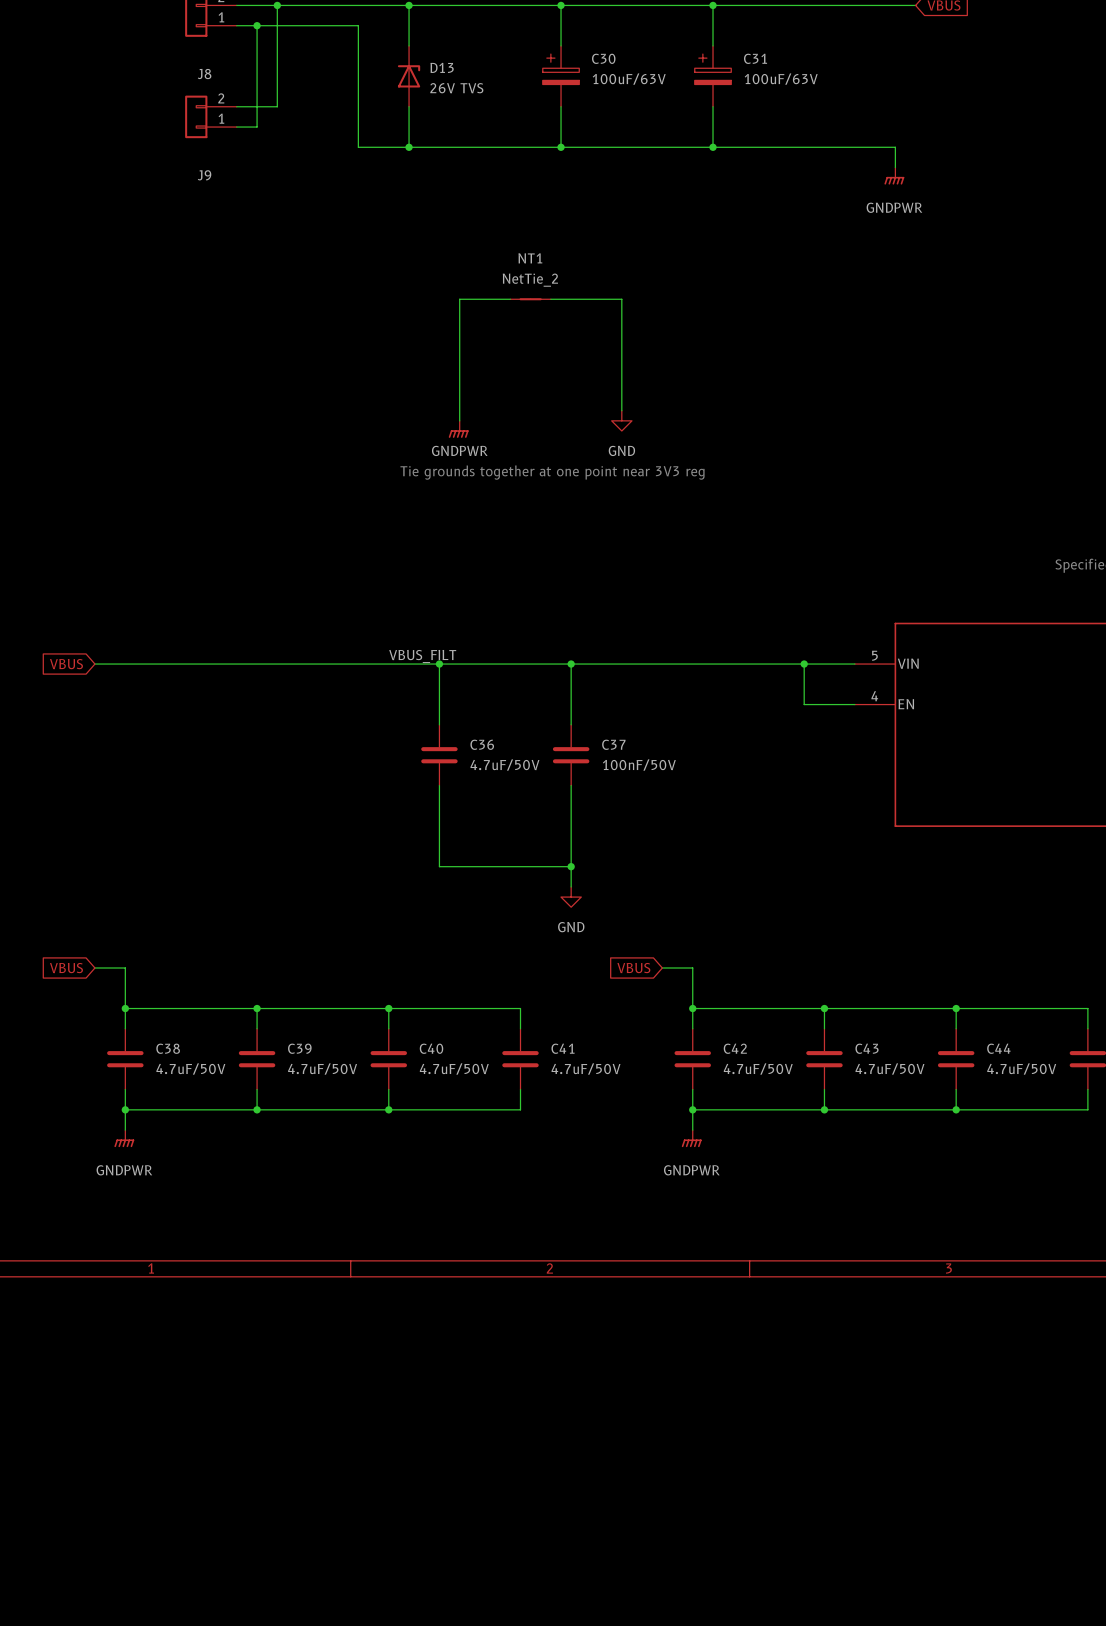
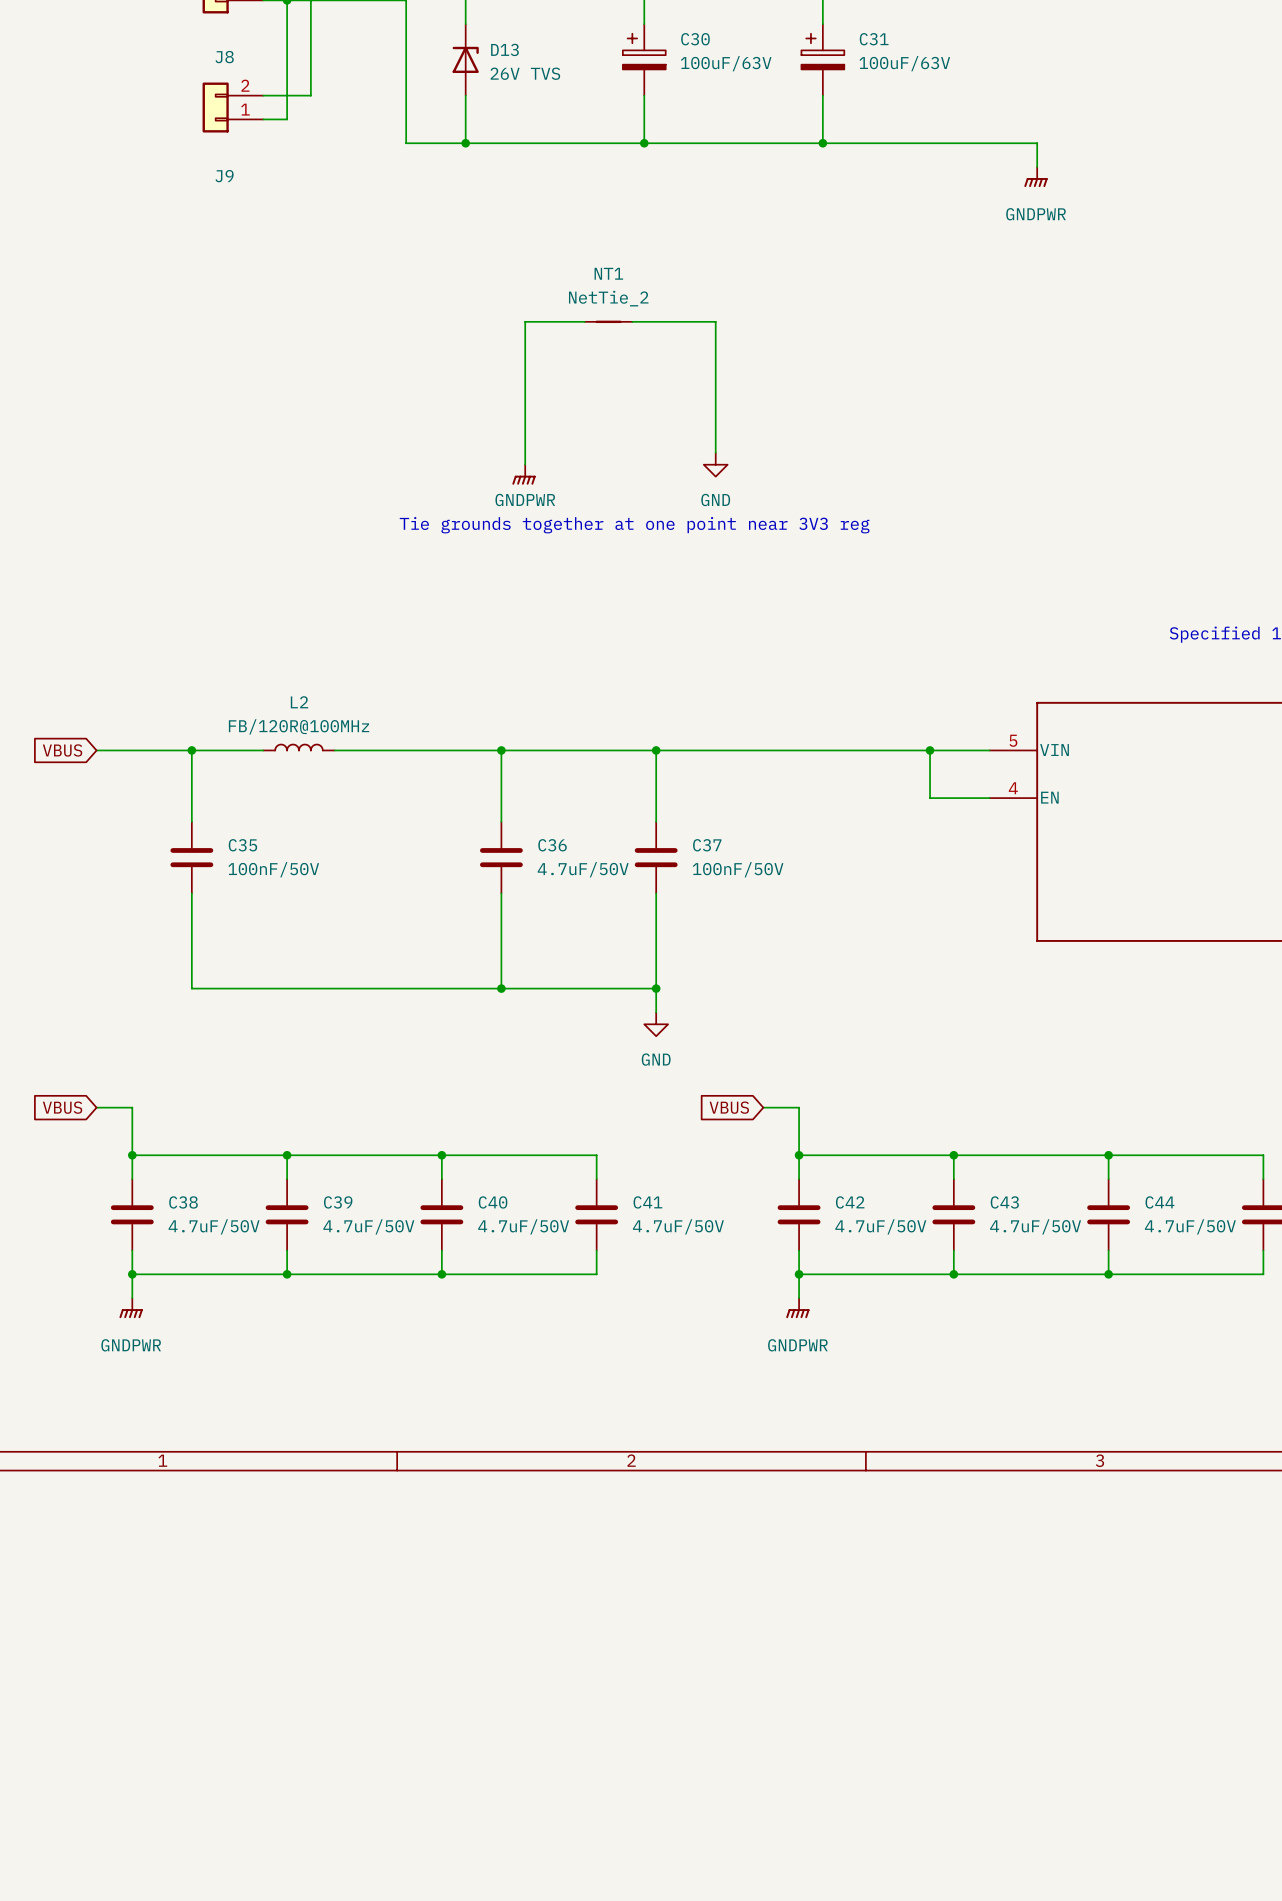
label: VBUS_FILT (422, 656) -> none
L2: none -> FB/120R@100MHz (299, 747)
wire: none -> (191, 750) (191, 821)
junction: none -> (191, 750)
wire: (236, 664) (297, 664) -> none
C35: none -> 100nF/50V (191, 857)
wire: none -> (191, 893) (191, 988) (501, 988)
junction: none -> (501, 988)

